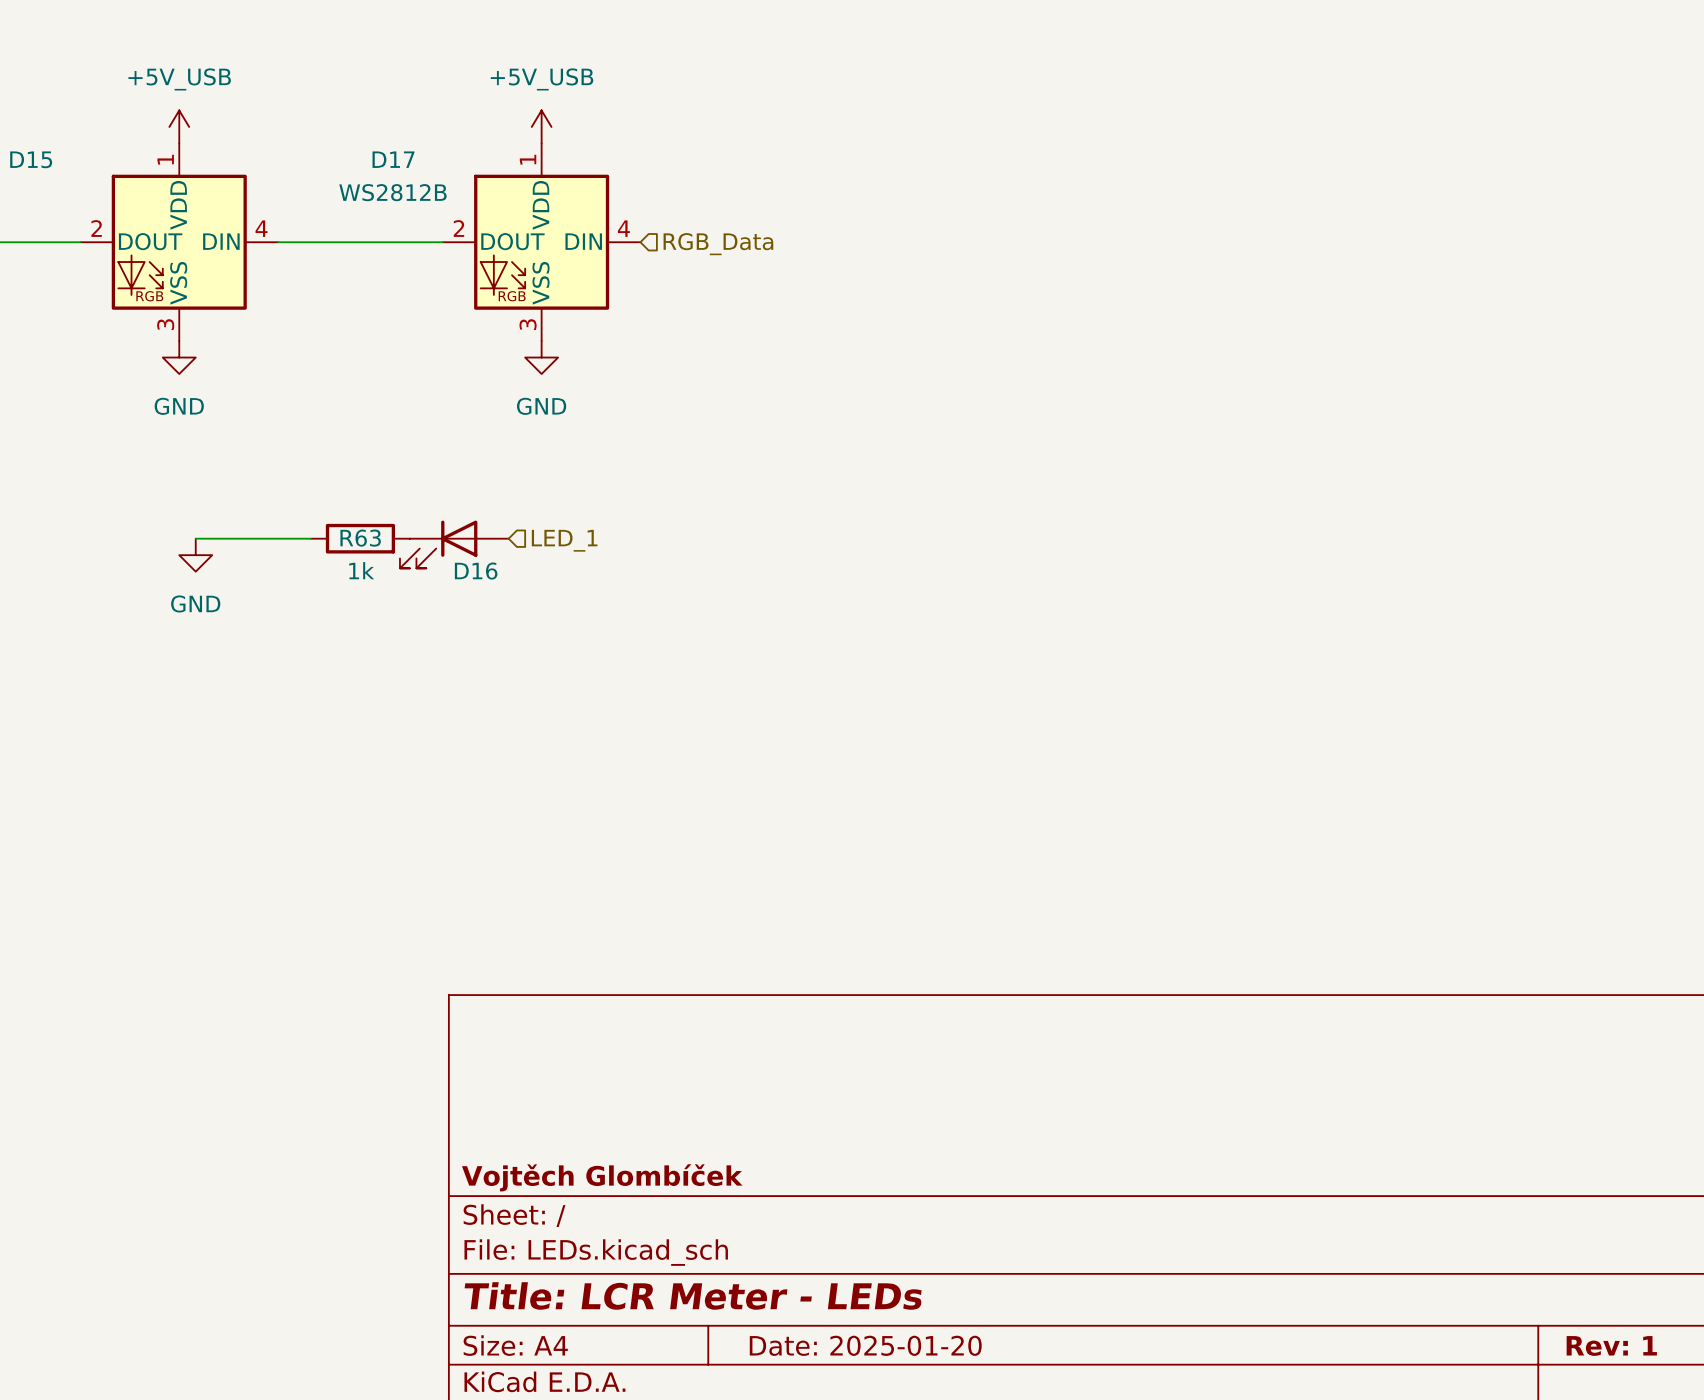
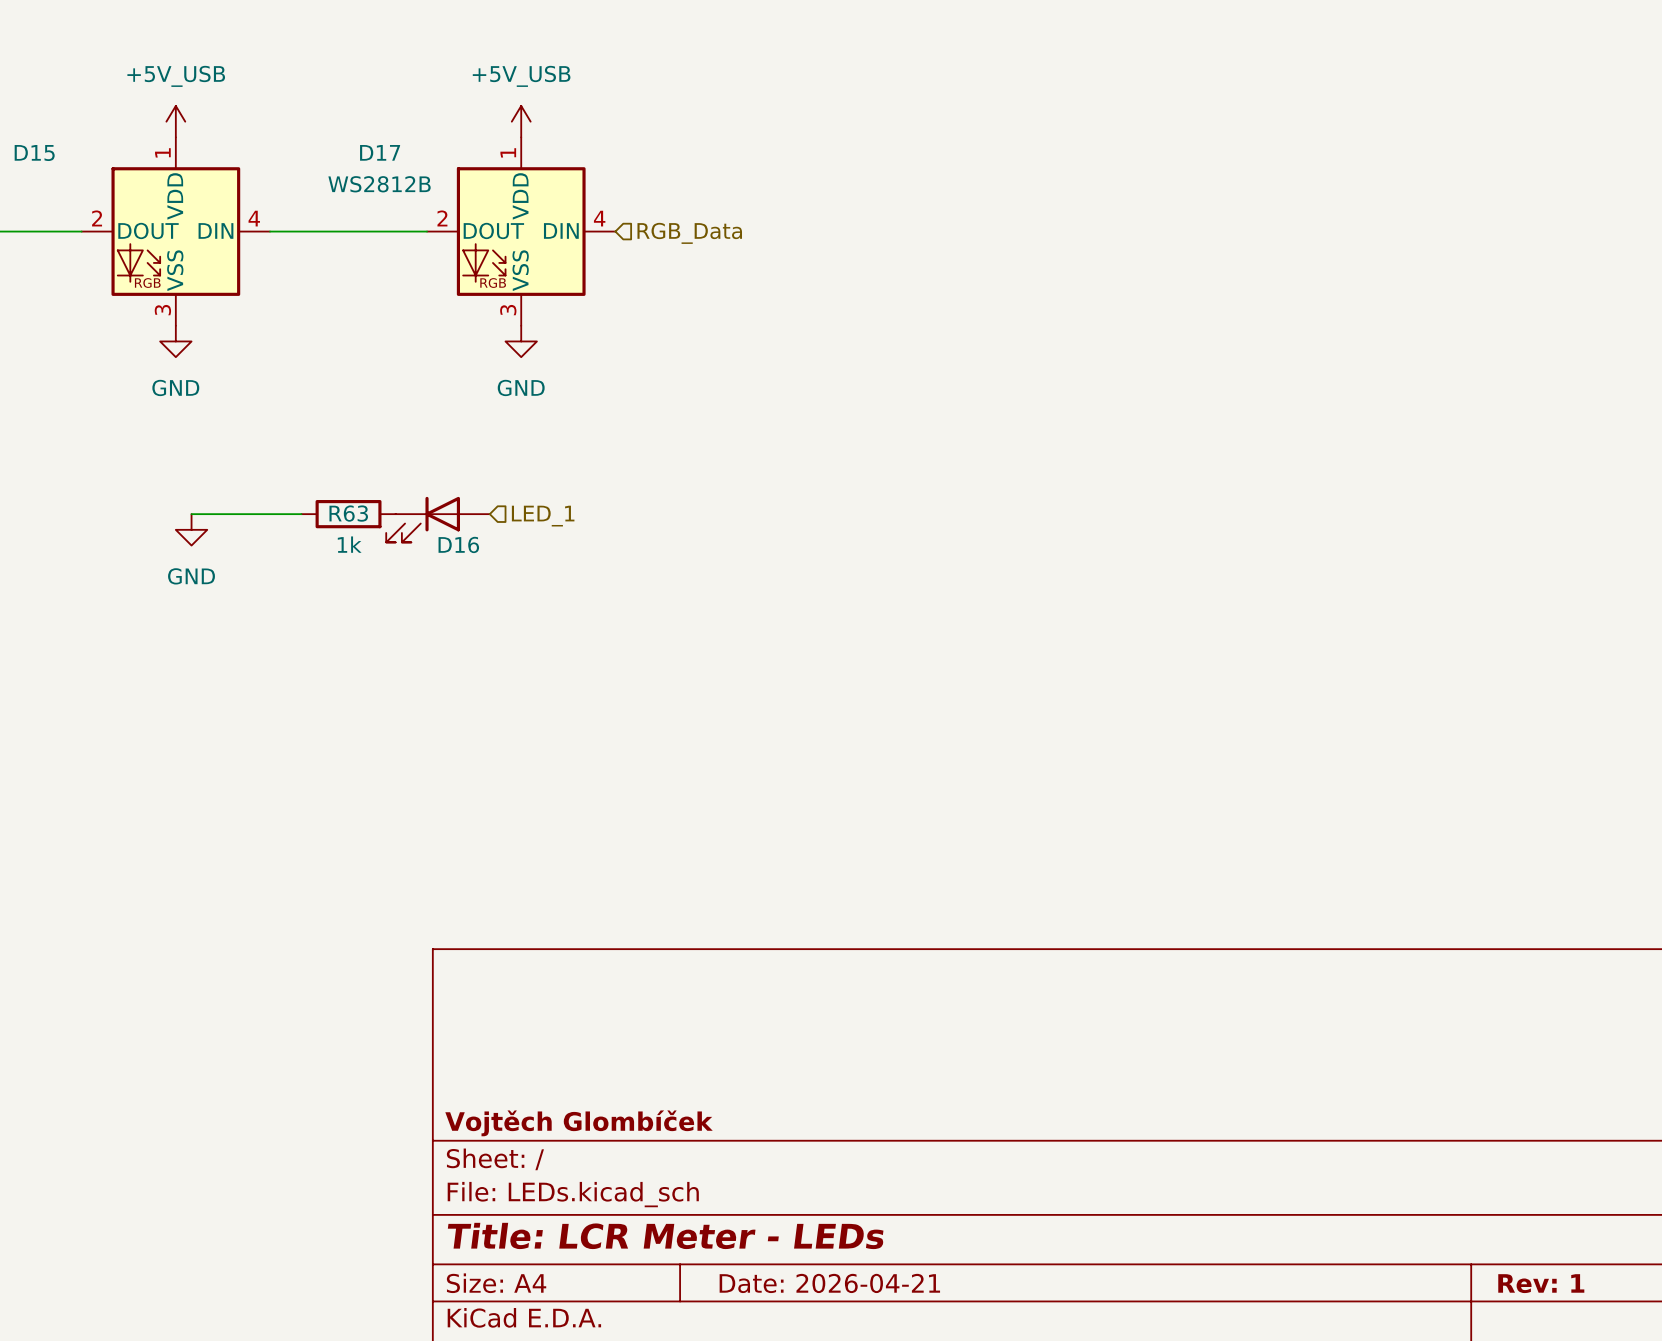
title block: Date: 2025-01-20 (865, 1345) -> Date: 2026-04-21 (829, 1283)

